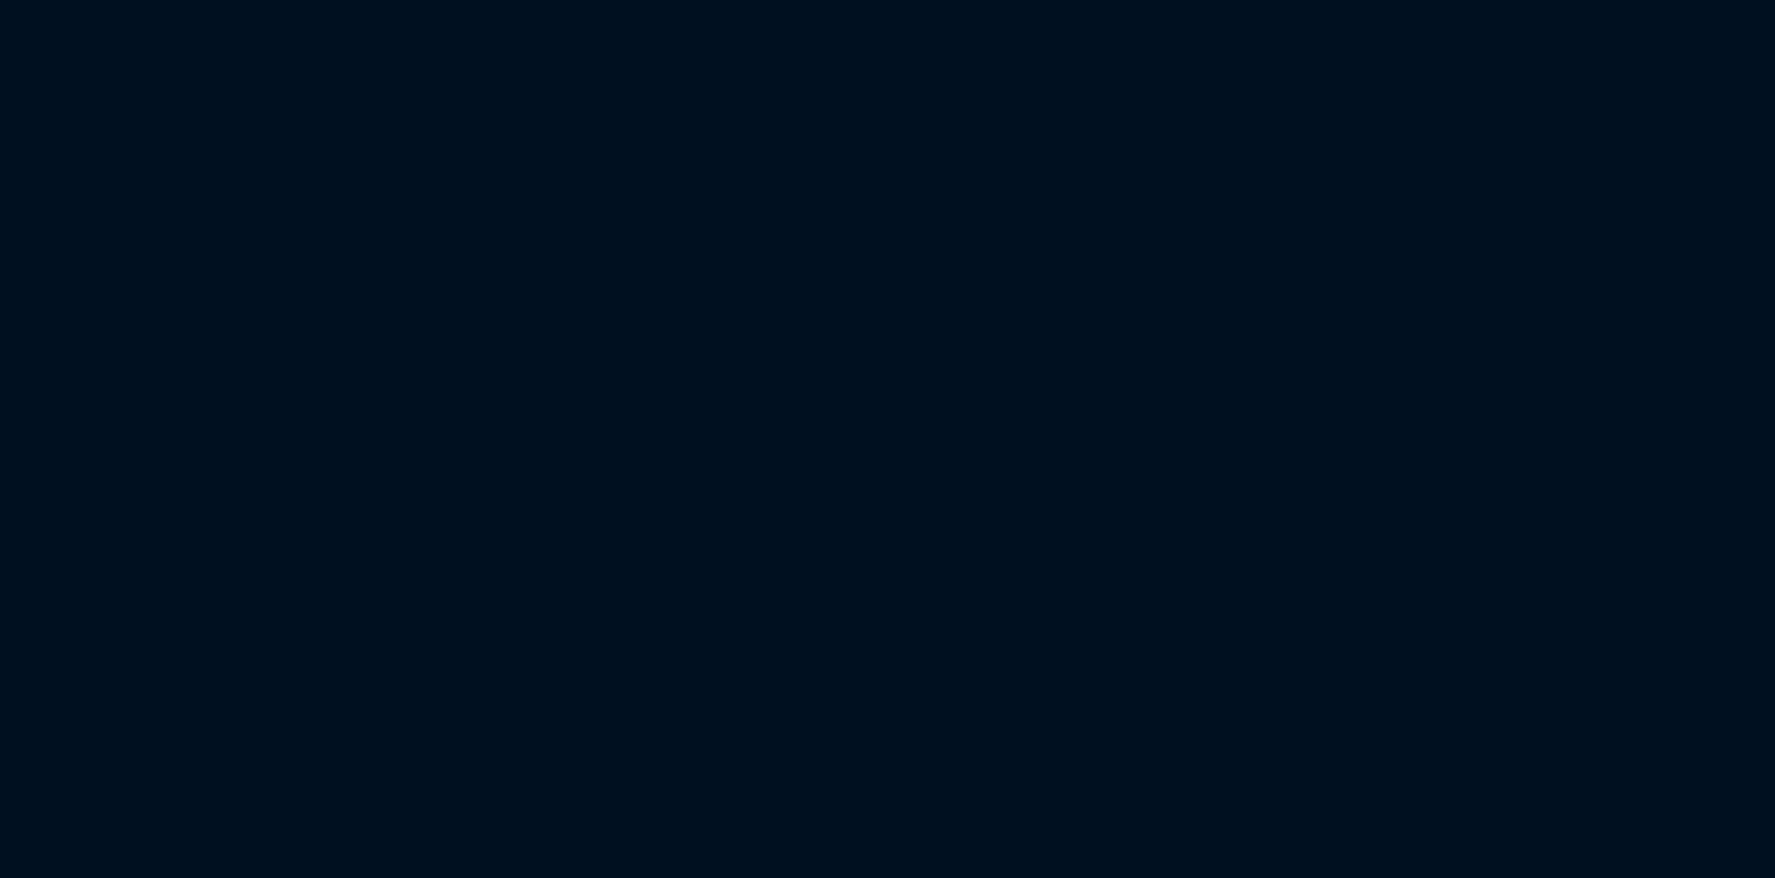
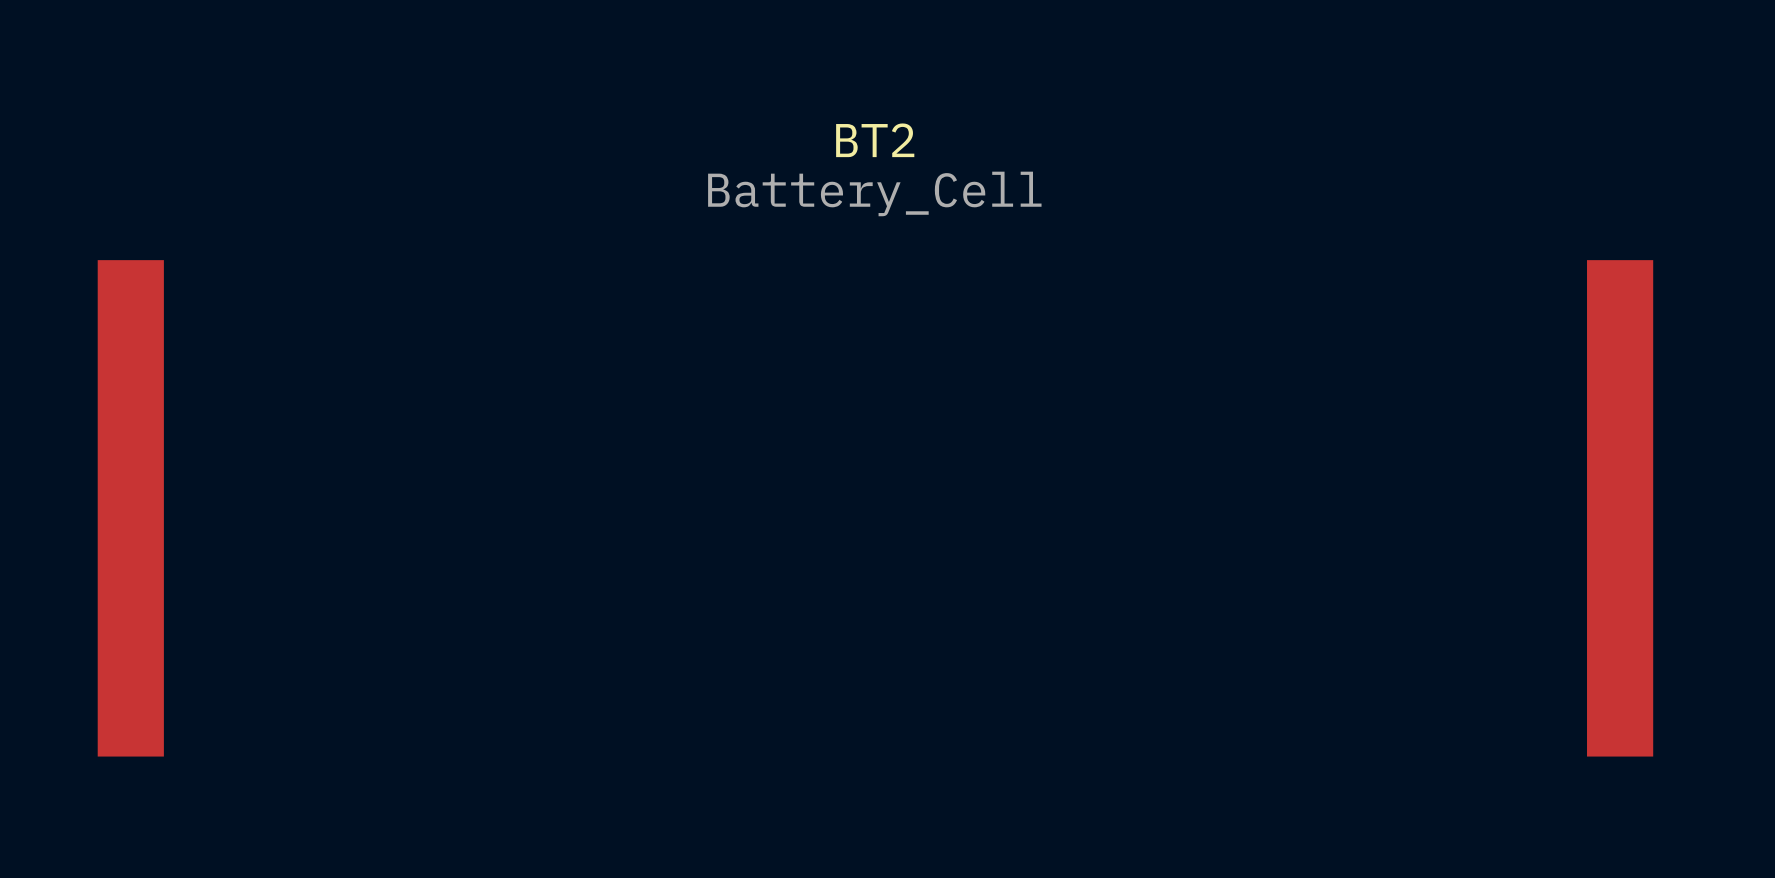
BT2: none -> Battery_Cell (875, 508)

